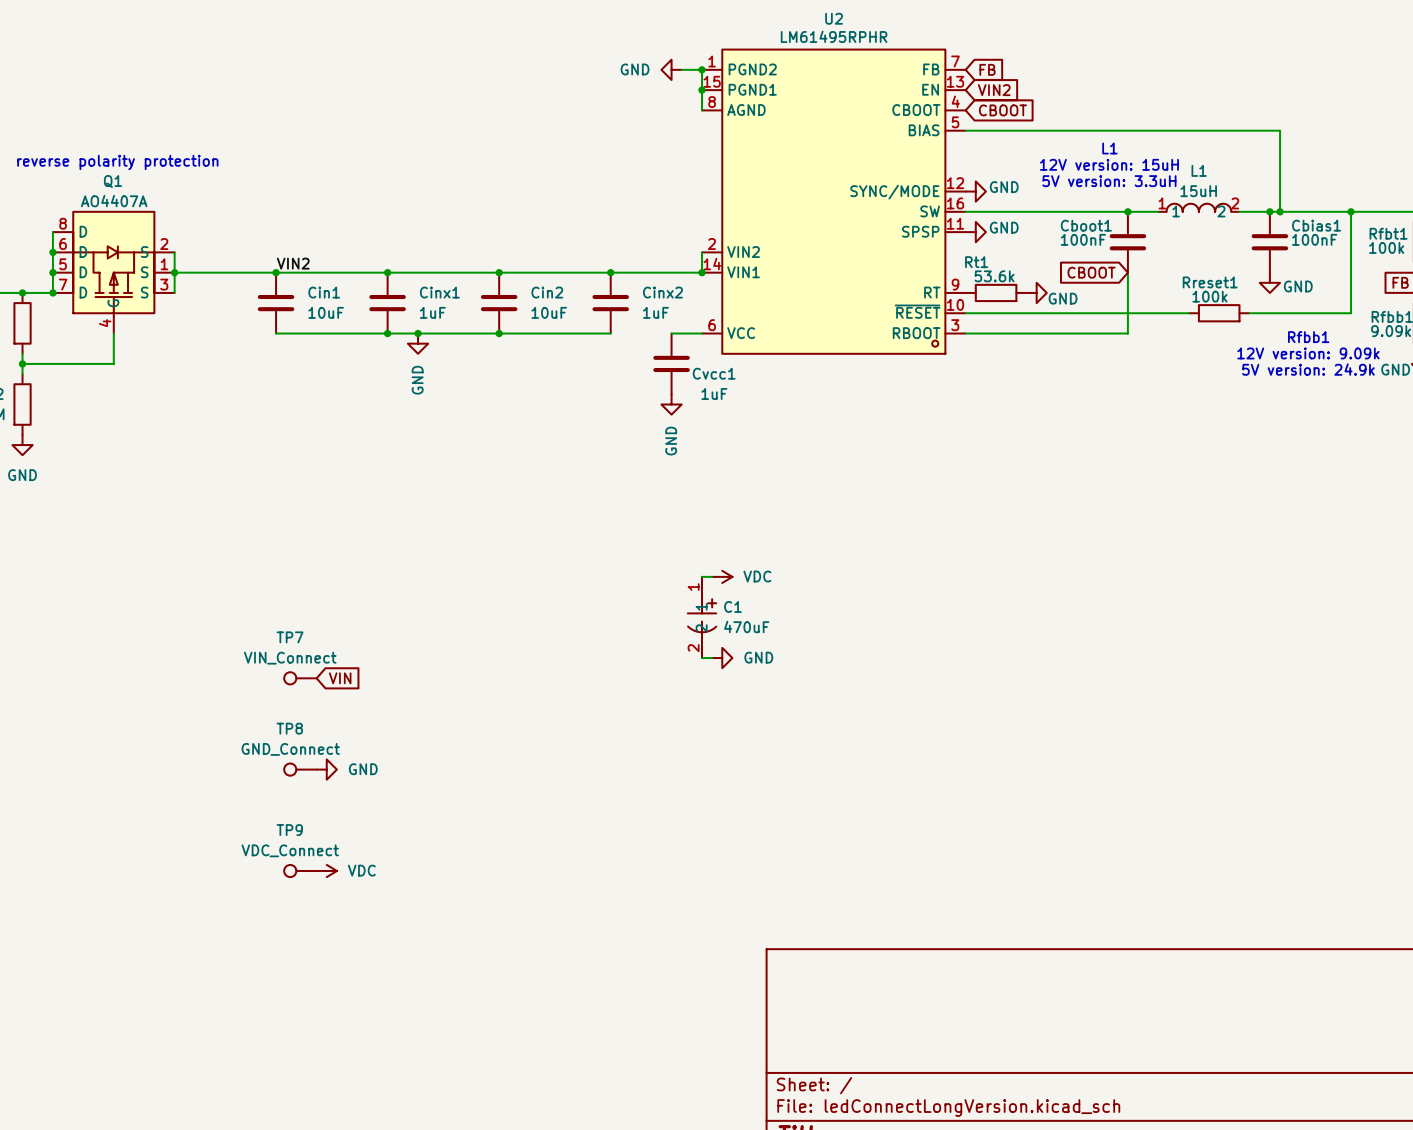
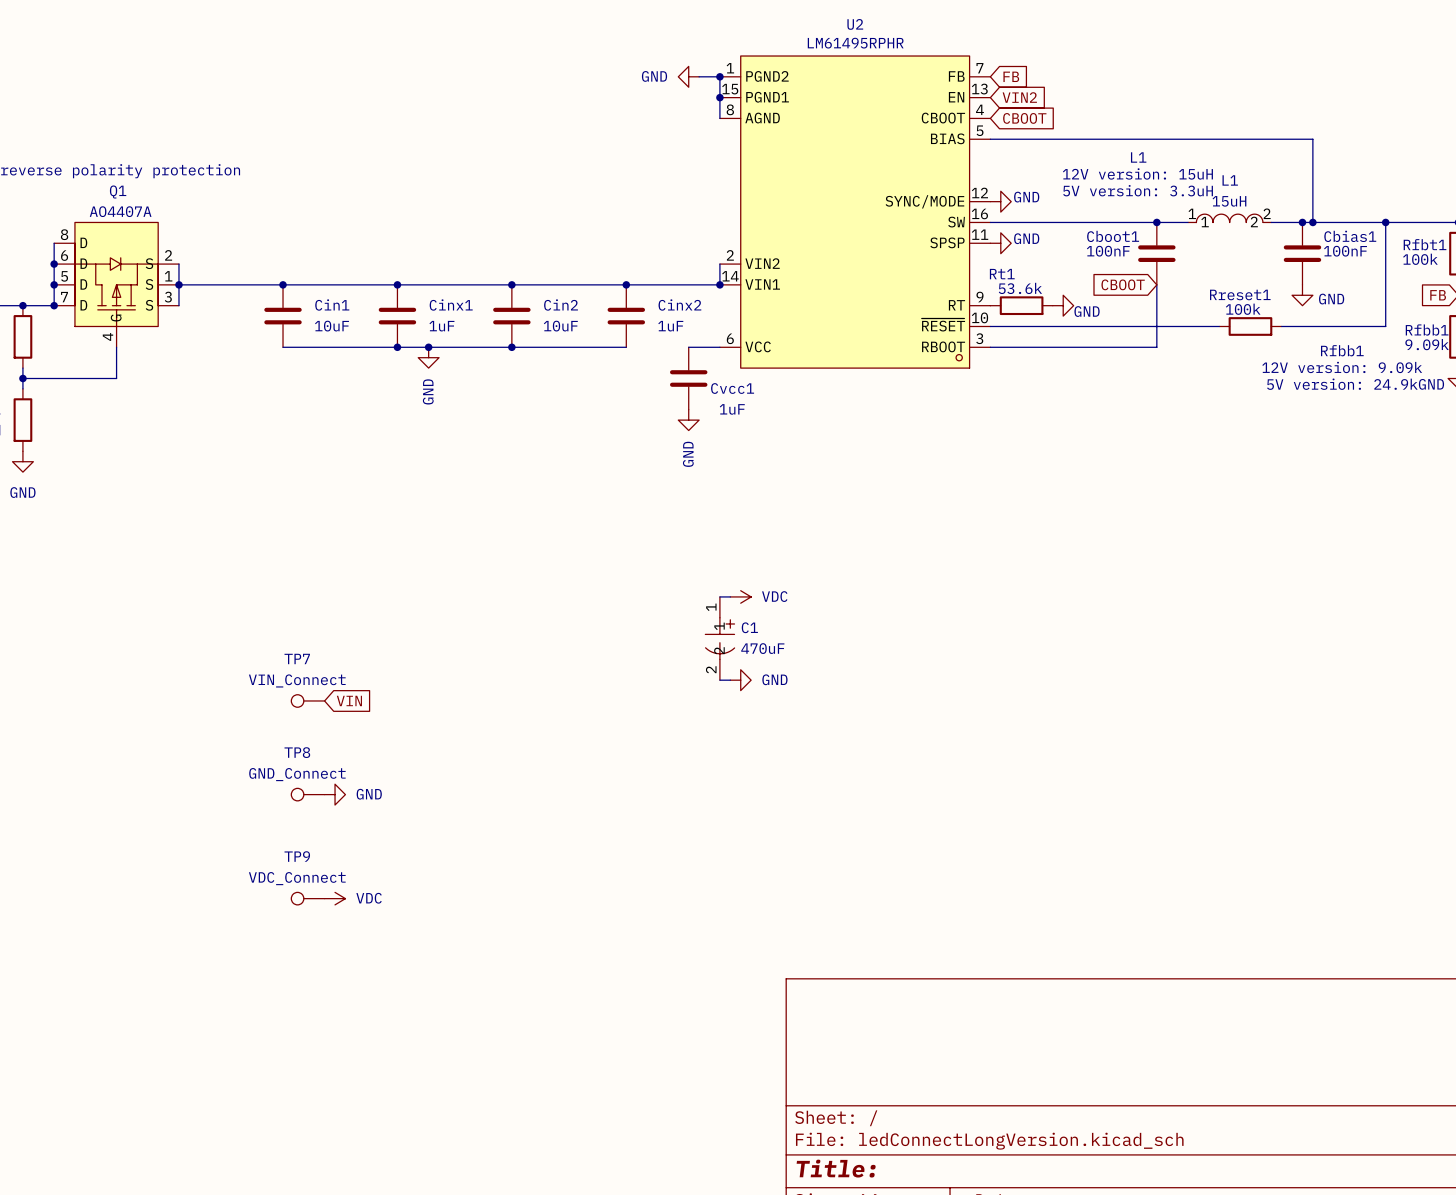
label: VIN2 (293, 263) -> none

